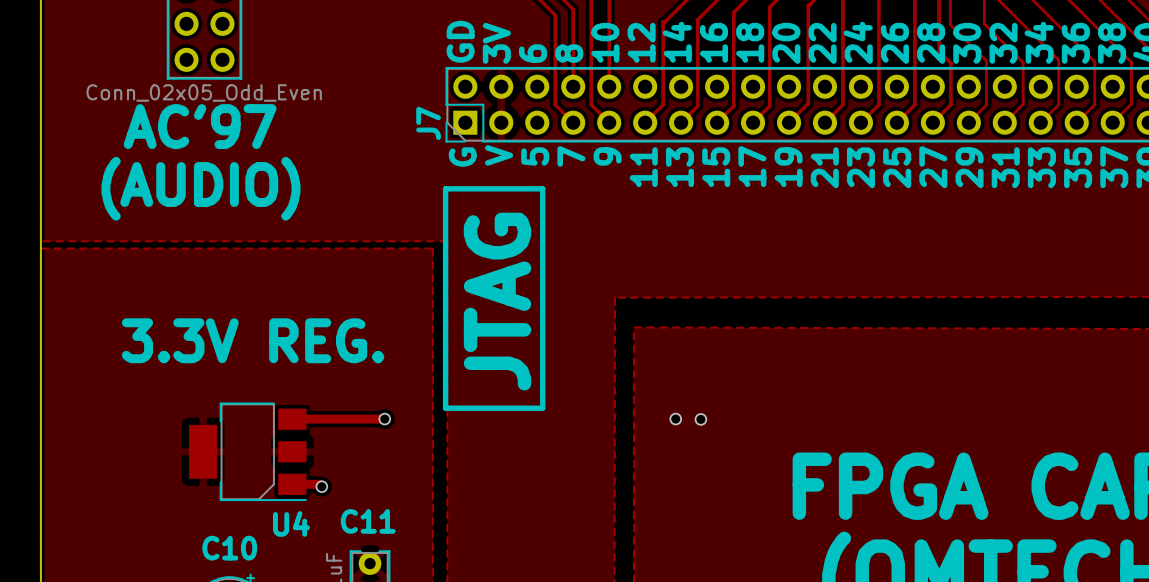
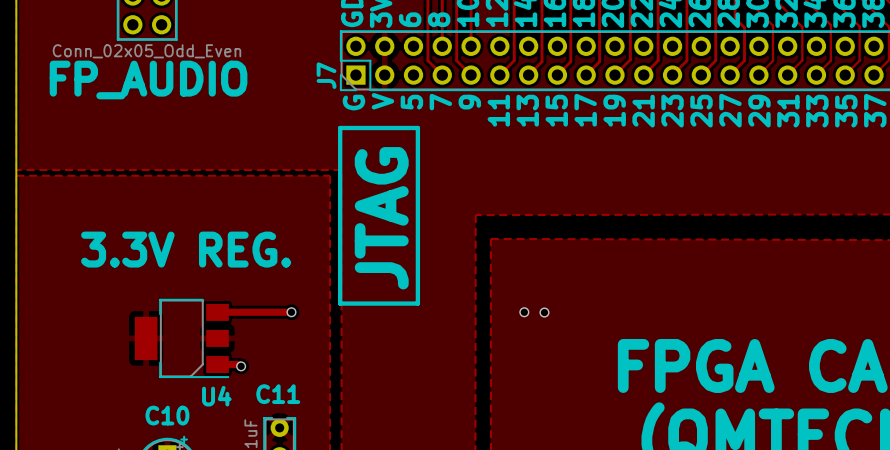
text: AC'97 (200, 126) -> FP_AUDIO (148, 79)
text: (AUDIO) (200, 188) -> none

